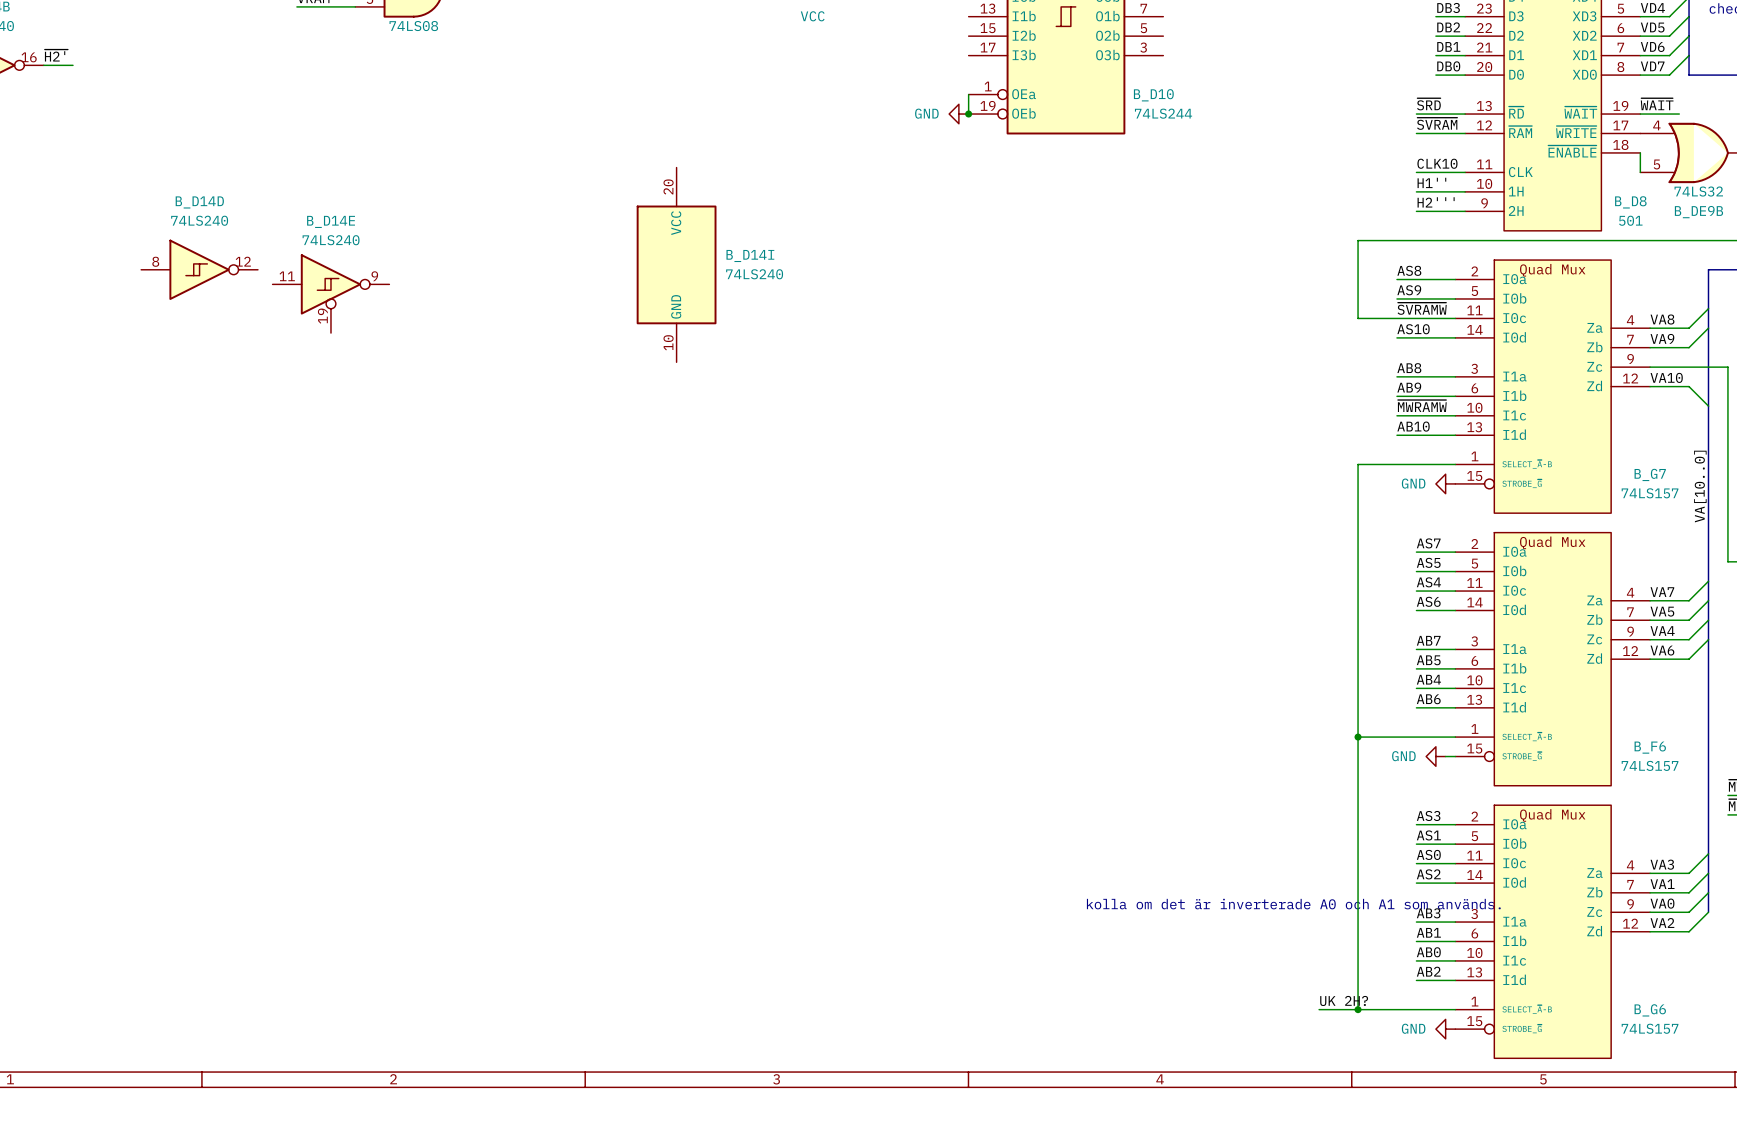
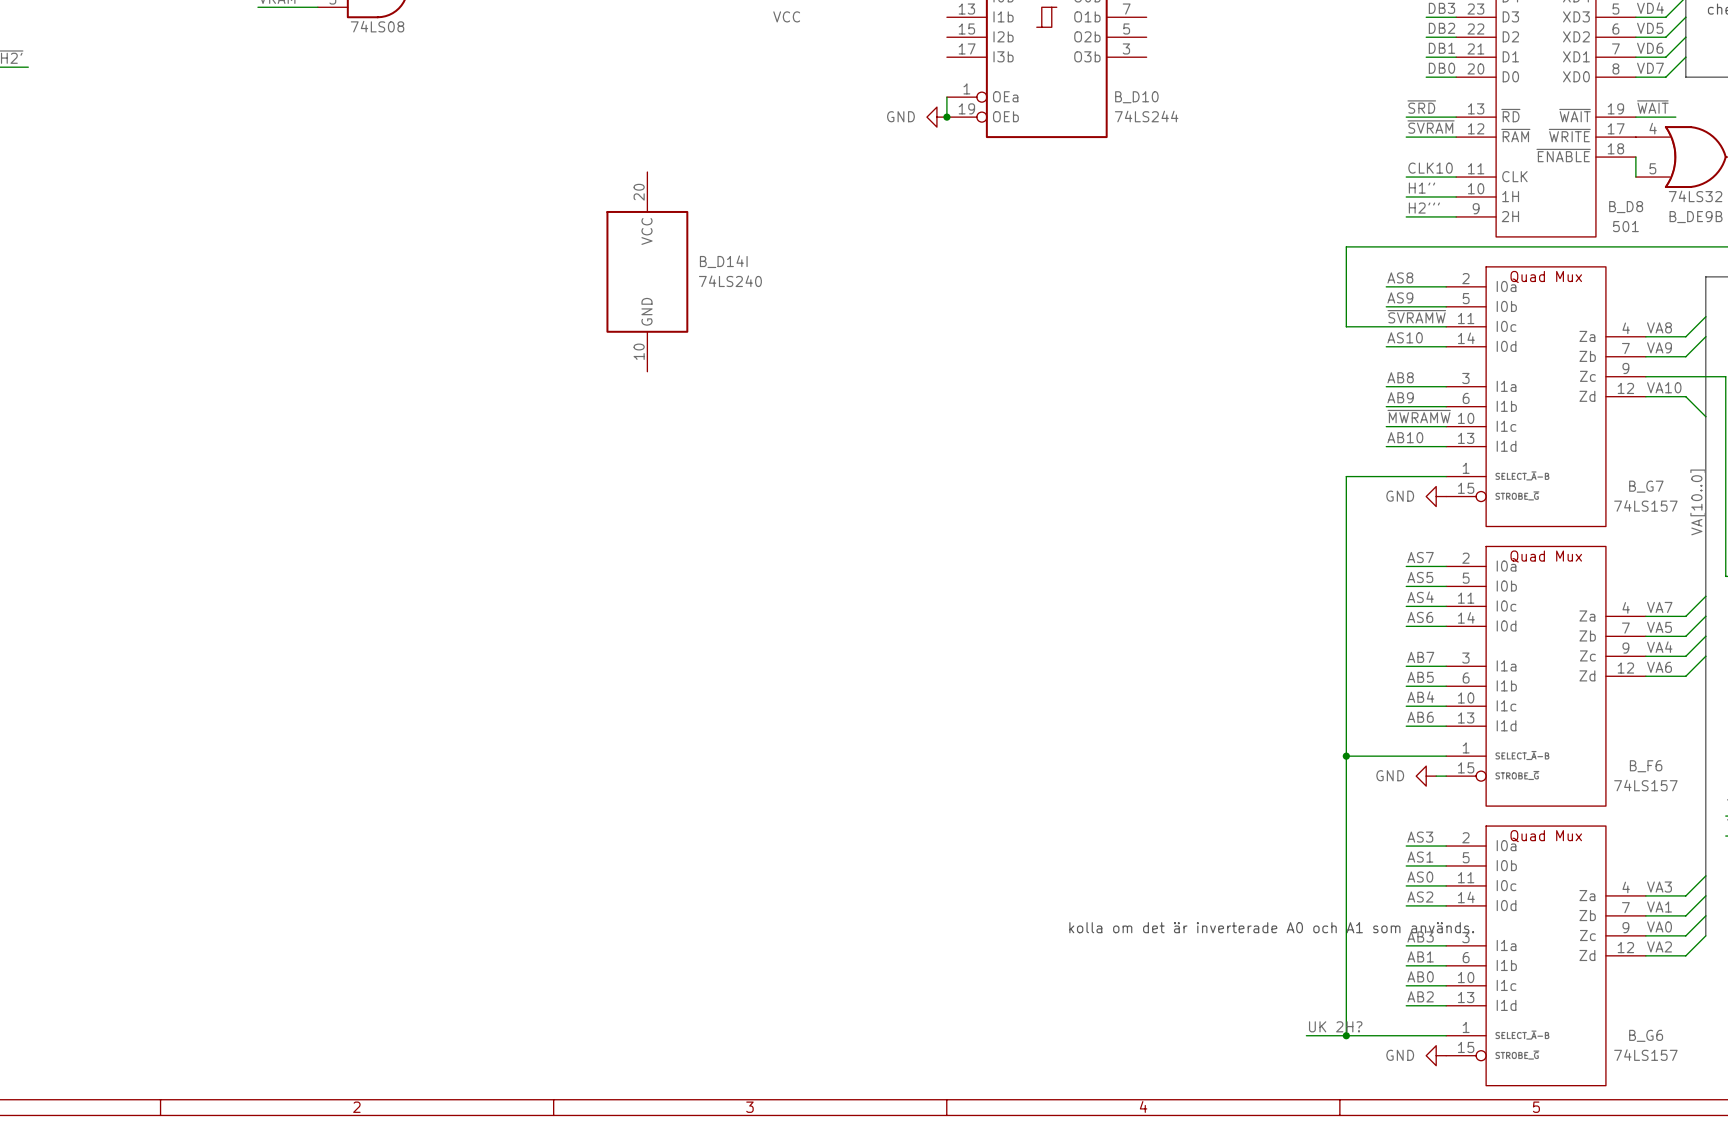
B_D14D: 74LS240 (199, 269) -> none
B_D14E: 74LS240 (330, 293) -> none

